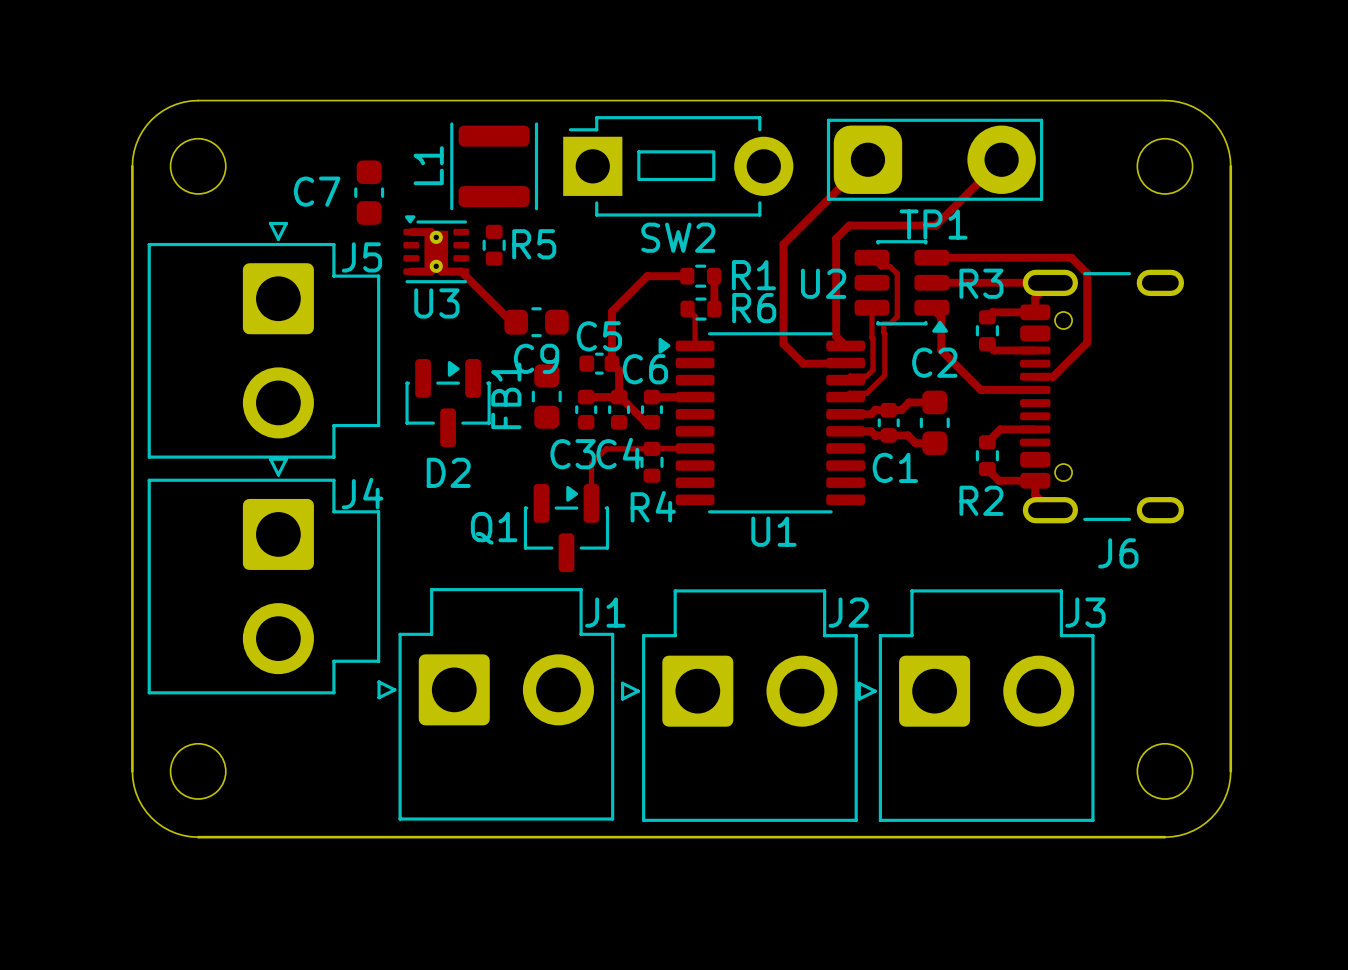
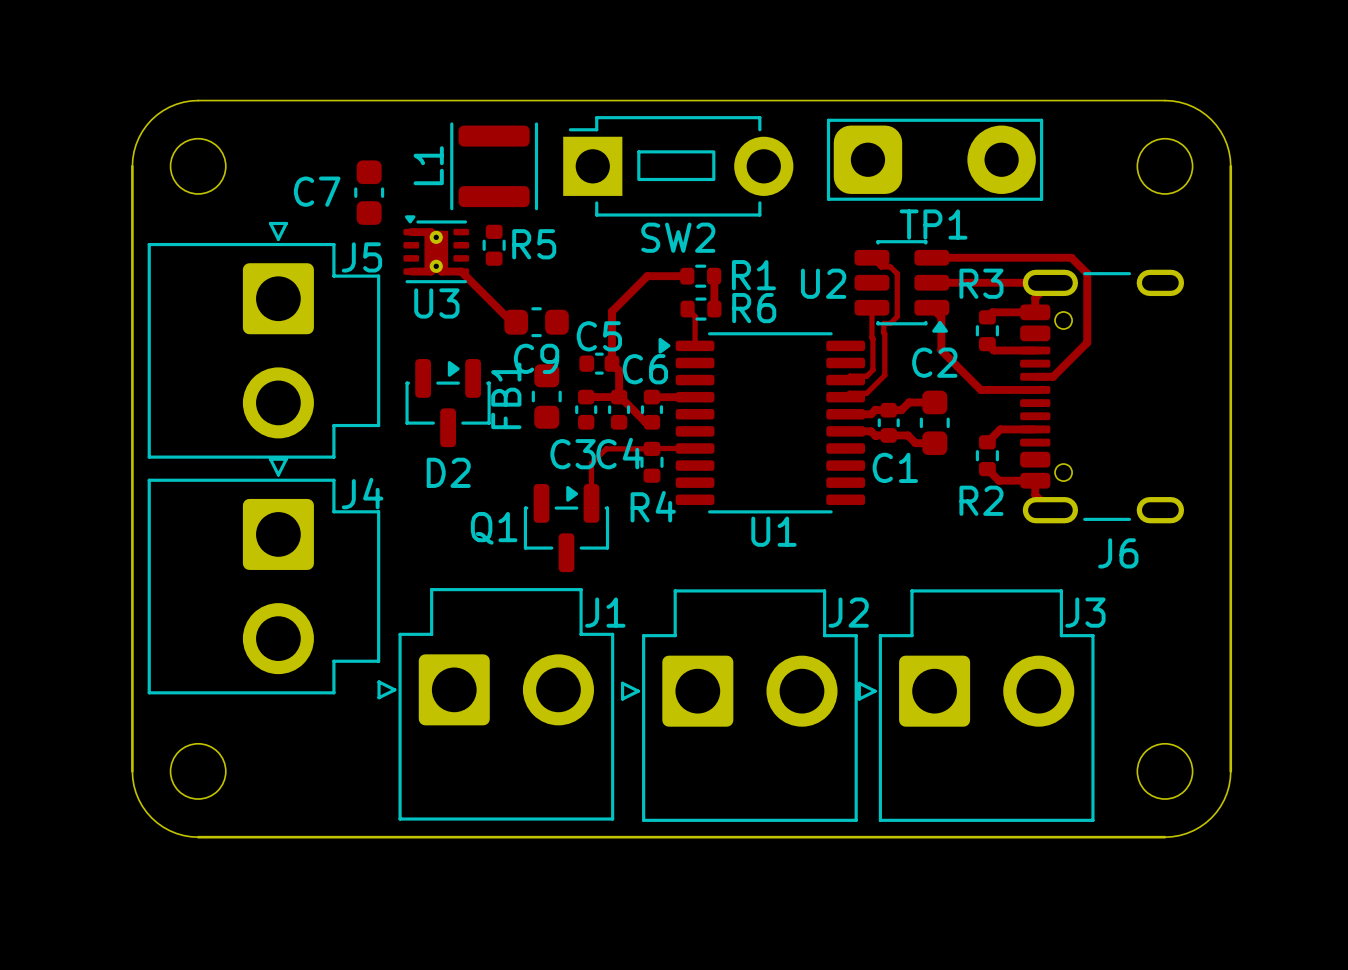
top track: (867, 159) (783, 244) (783, 343) (803, 363) (845, 362) -> none
top track: (1001, 159) (935, 225) (849, 225) (836, 238) (836, 336) (845, 345) -> none

